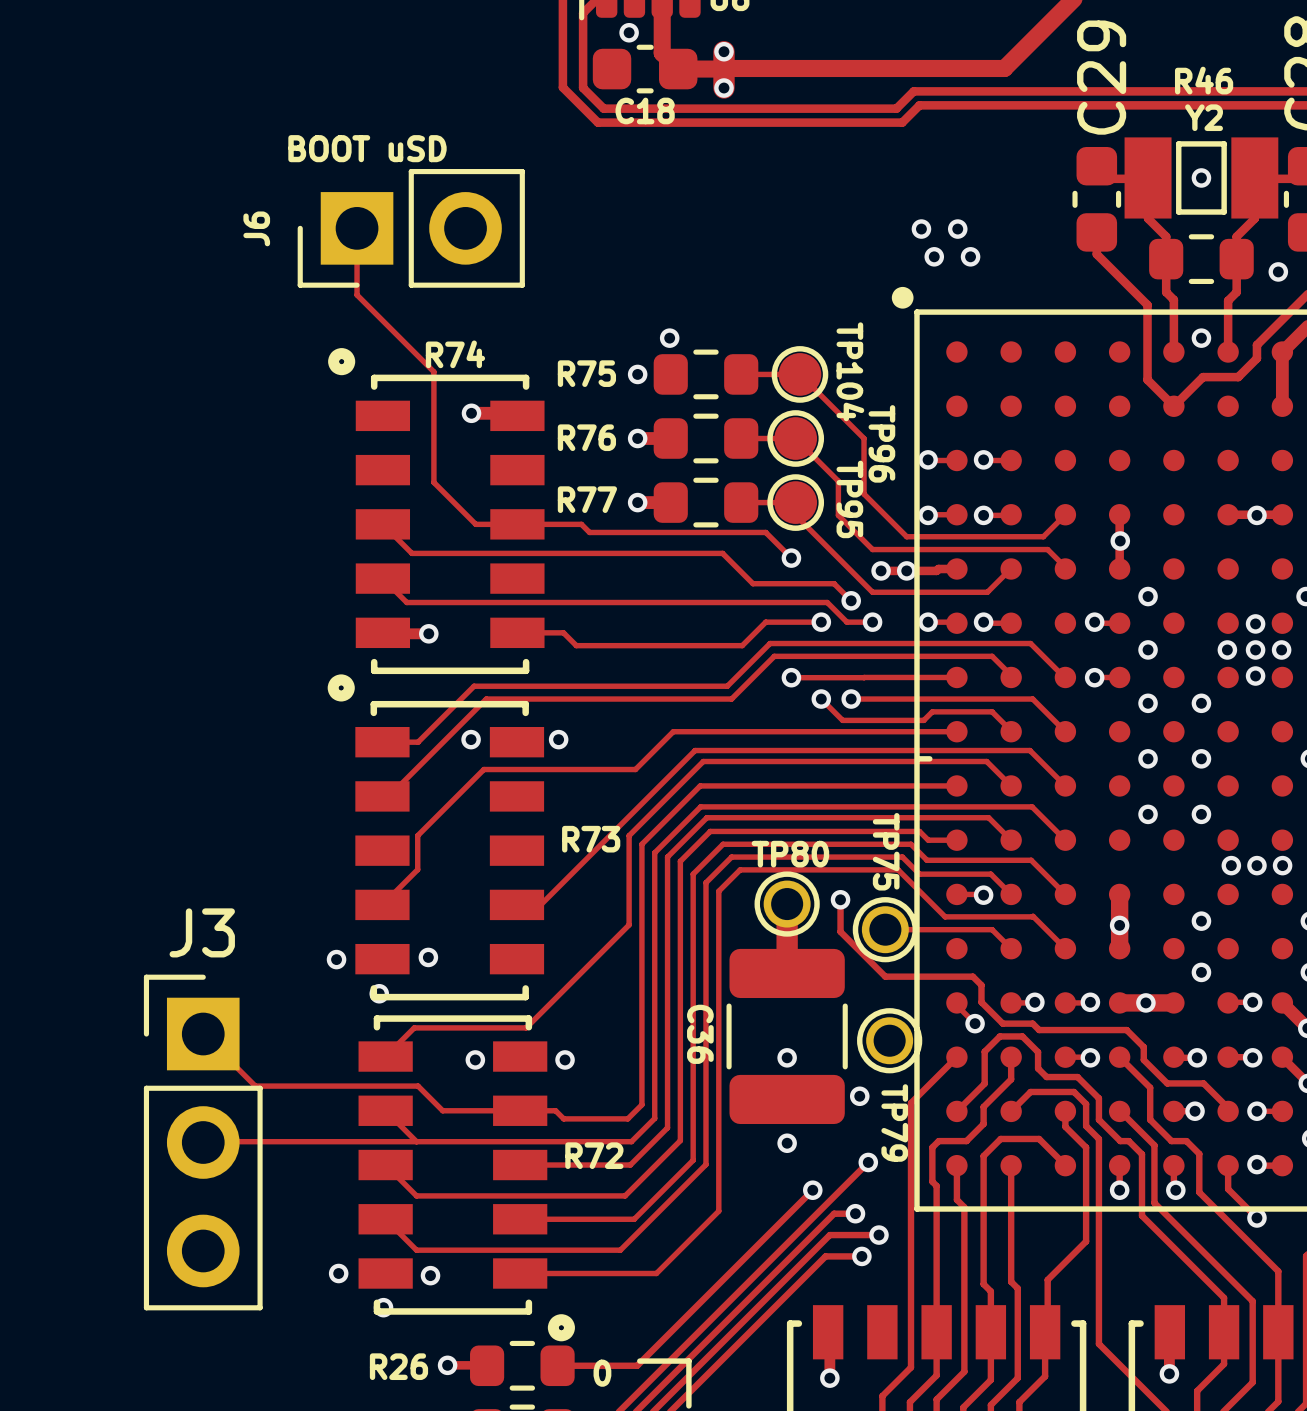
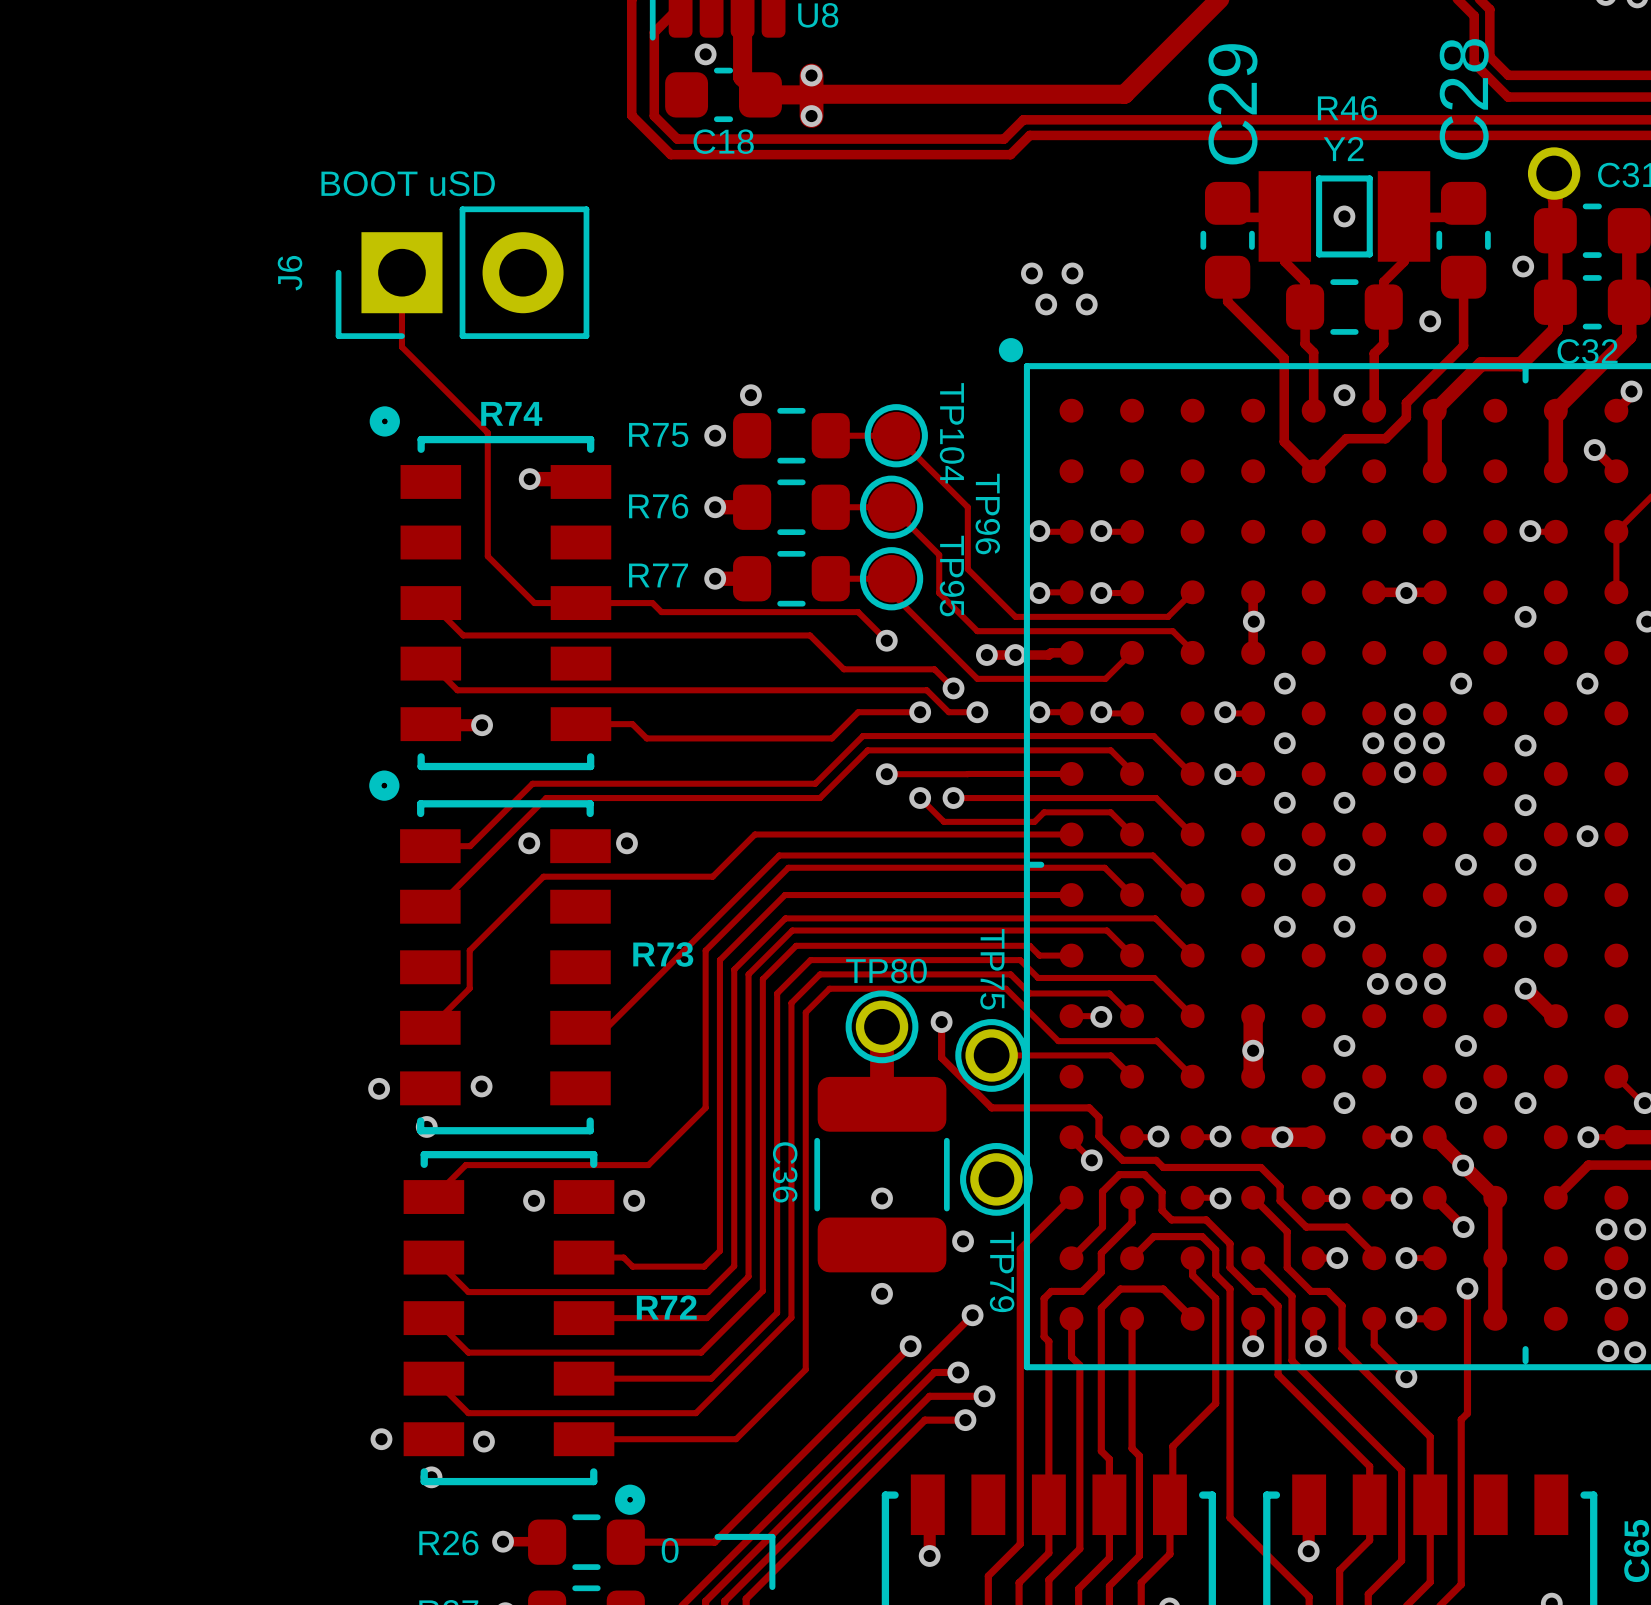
track: (629, 924) (526, 1027) -> (705, 1050) (705, 1107) (648, 1165) (590, 1165)
track: (203, 1034) (255, 1086) (418, 1086) (442, 1110) (520, 1110) -> none
track: (416, 1141) (203, 1142) -> none
J3: (203, 1142) -> none

